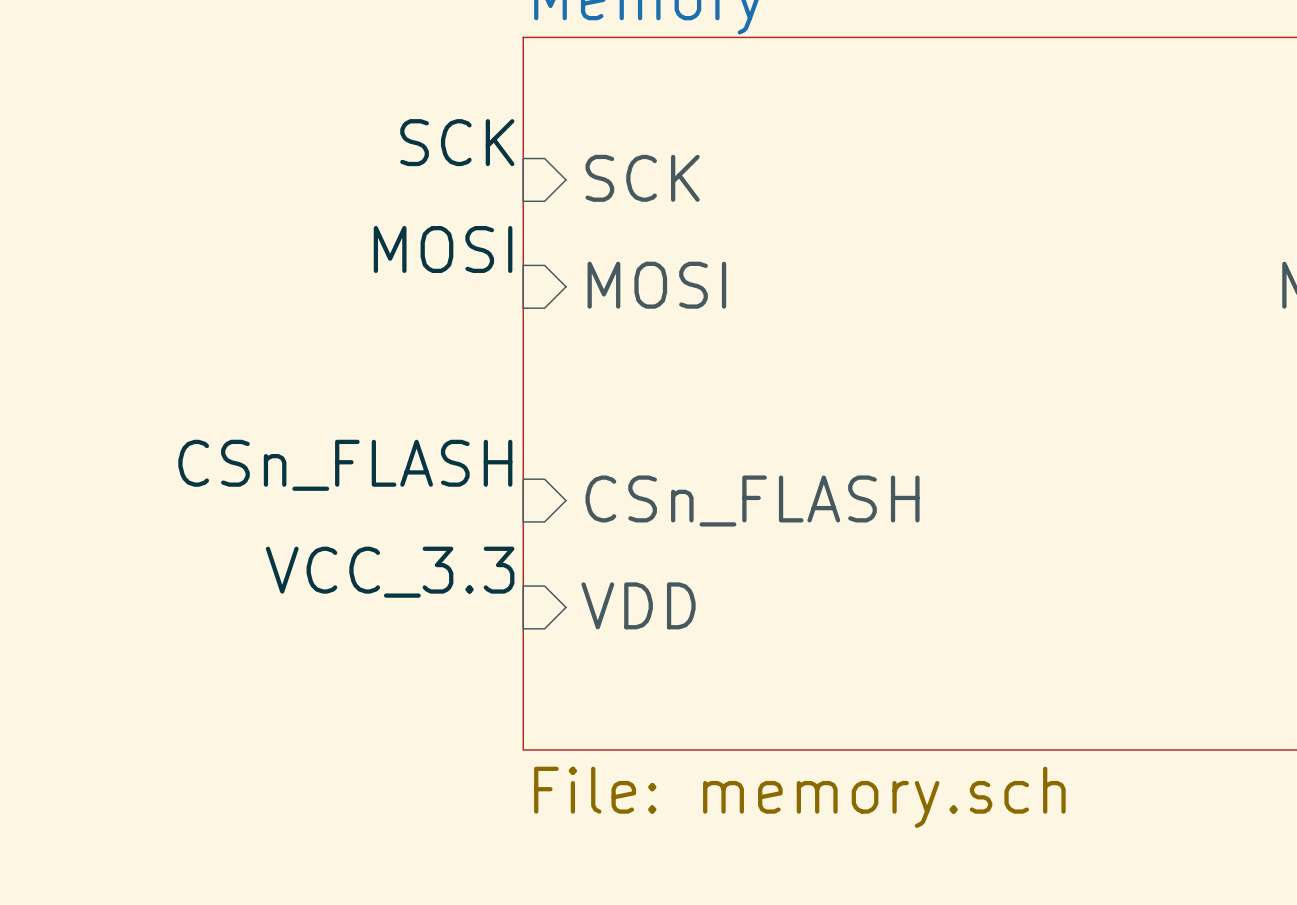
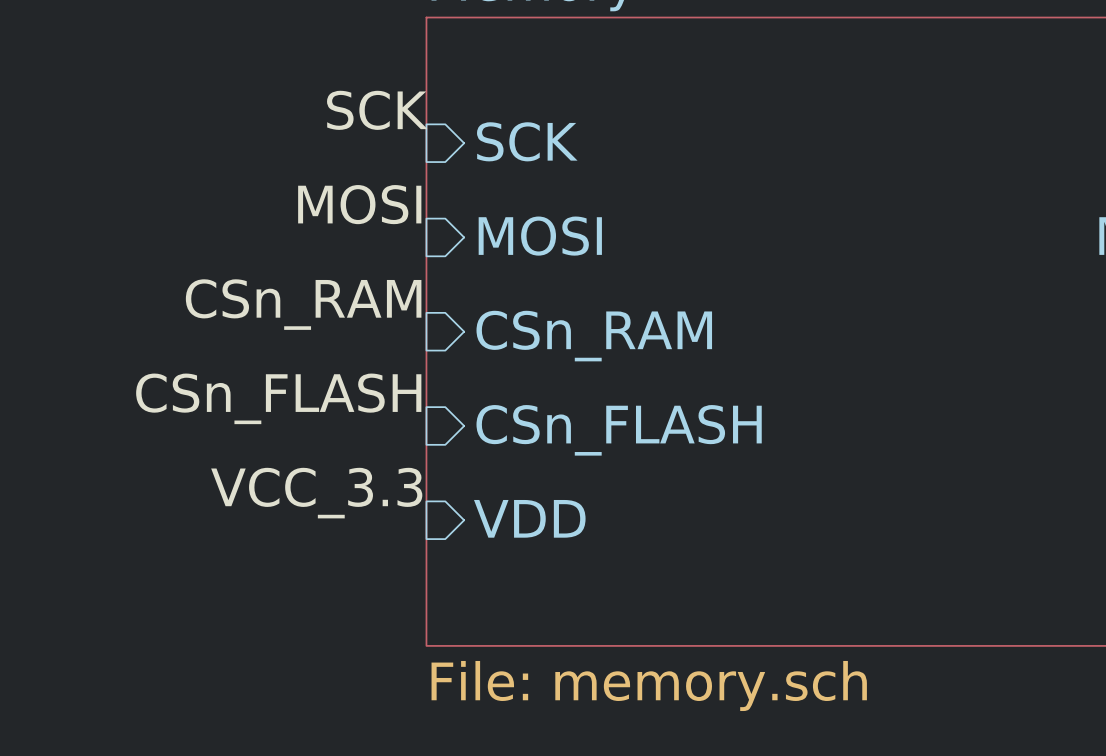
label: none -> CSn_RAM (303, 304)
sheet pin: none -> CSn_RAM (594, 336)

